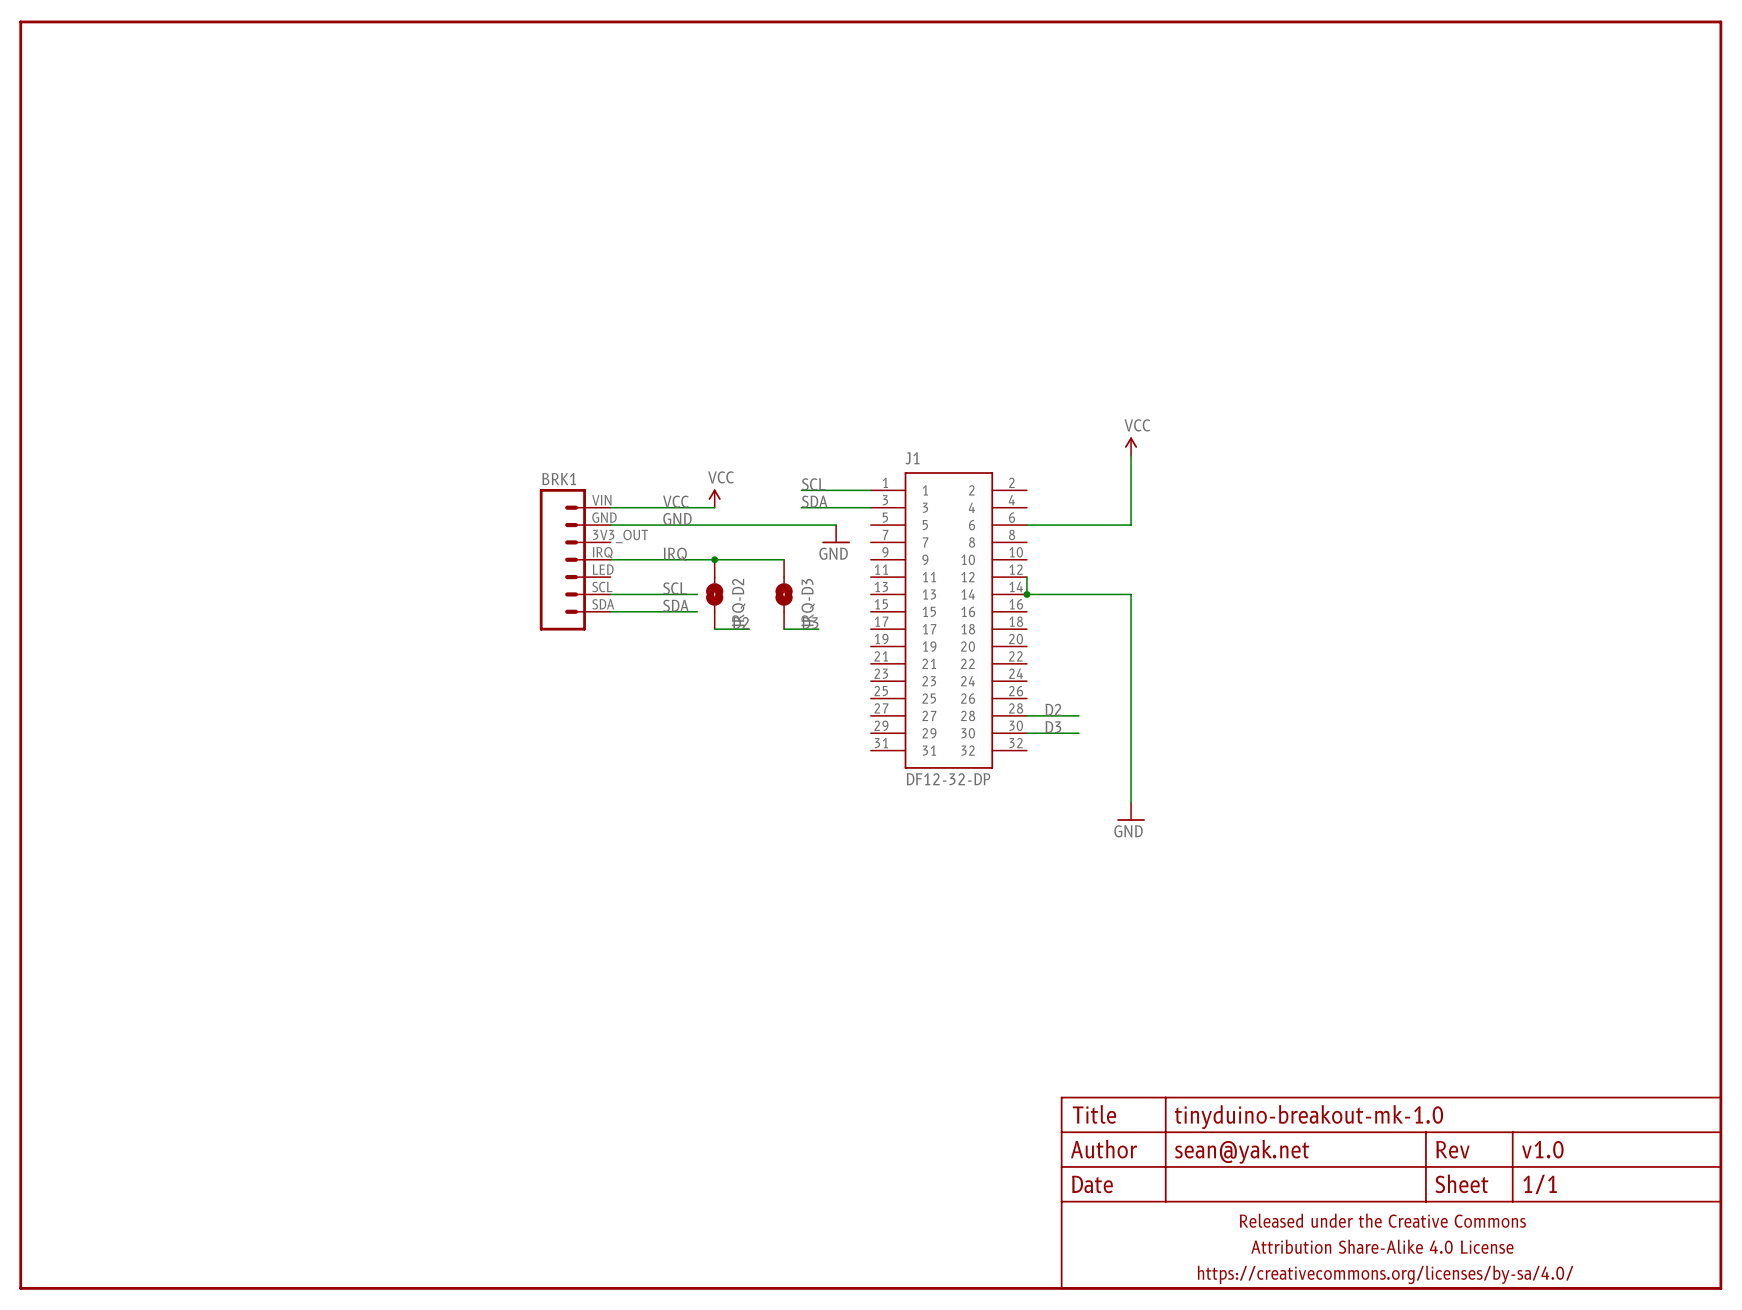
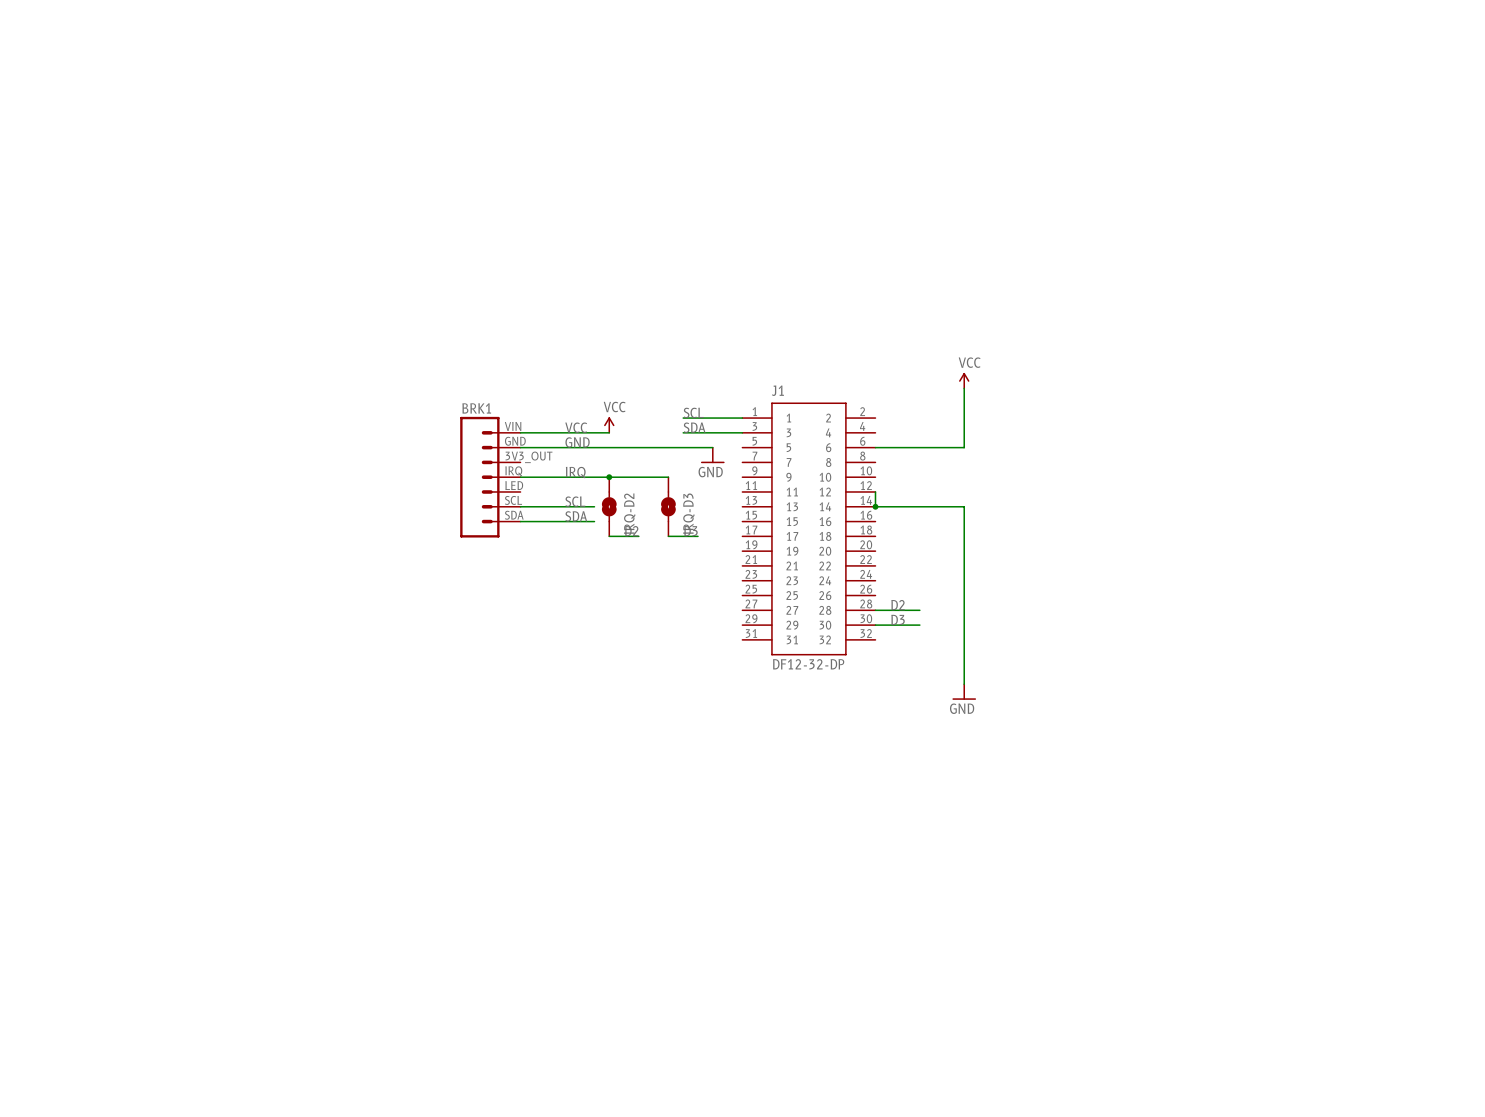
part: (870, 655) -> none
part: (1391, 1192) -> none

